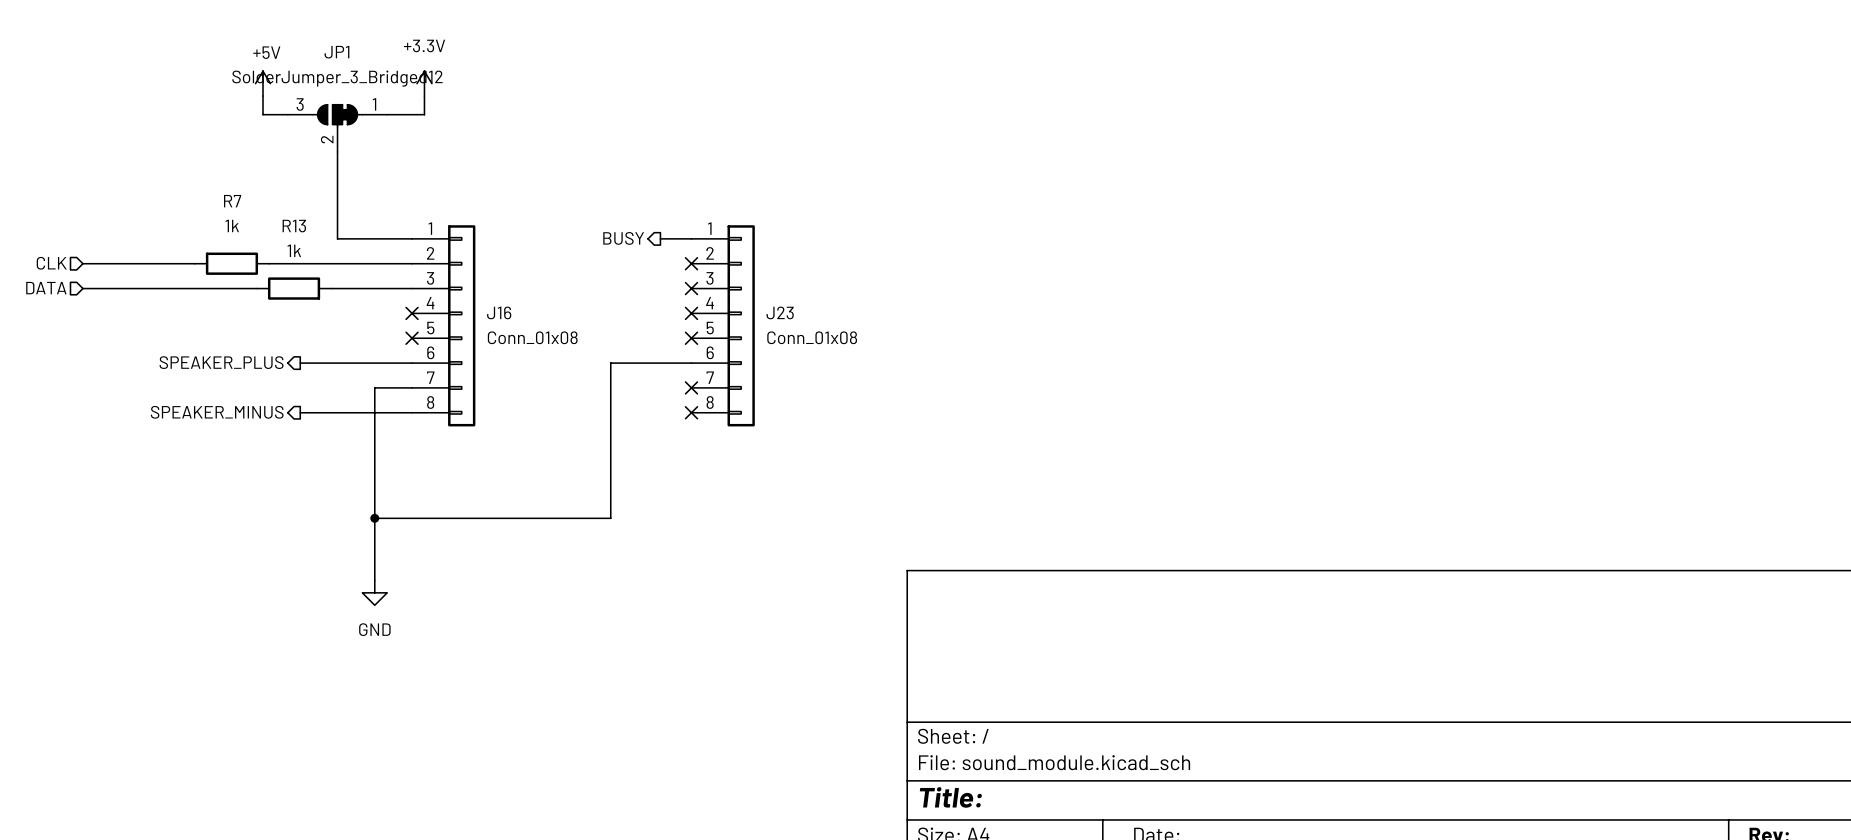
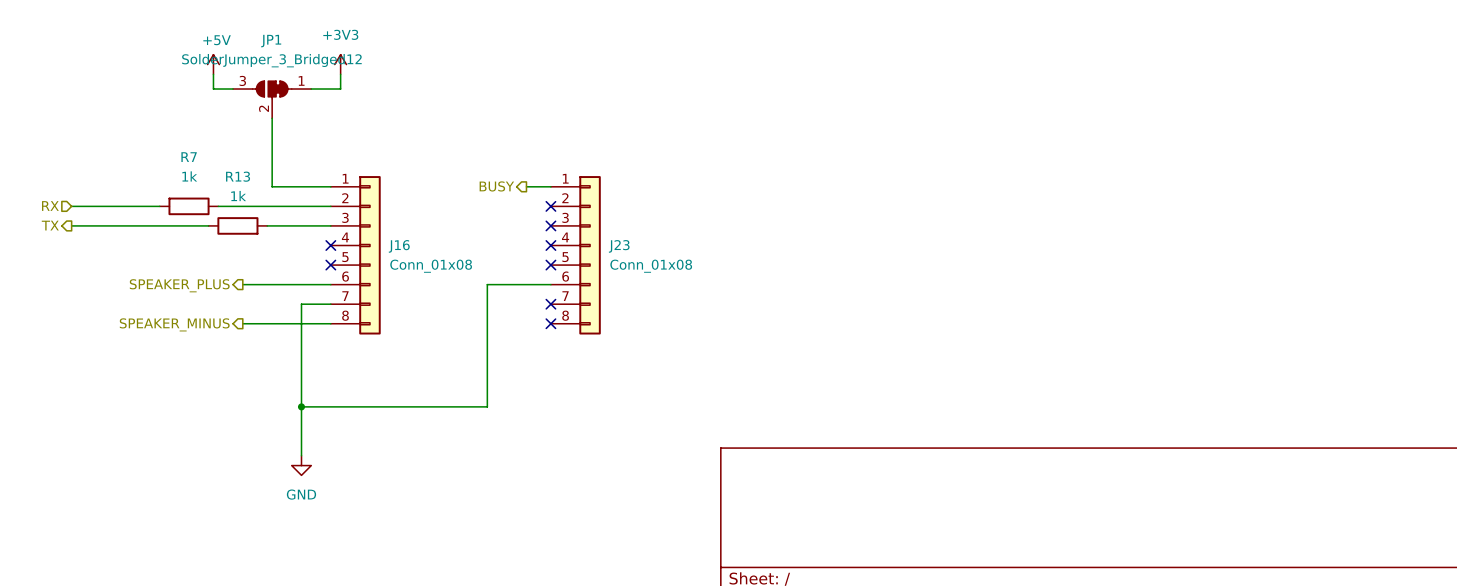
power symbol: +3.3V (424, 83) -> +3V3 (340, 64)
hierarchical label: CLK (51, 263) -> RX (50, 206)
hierarchical label shape: input (46, 288) -> output (50, 225)
hierarchical label: DATA (46, 288) -> TX (50, 225)

